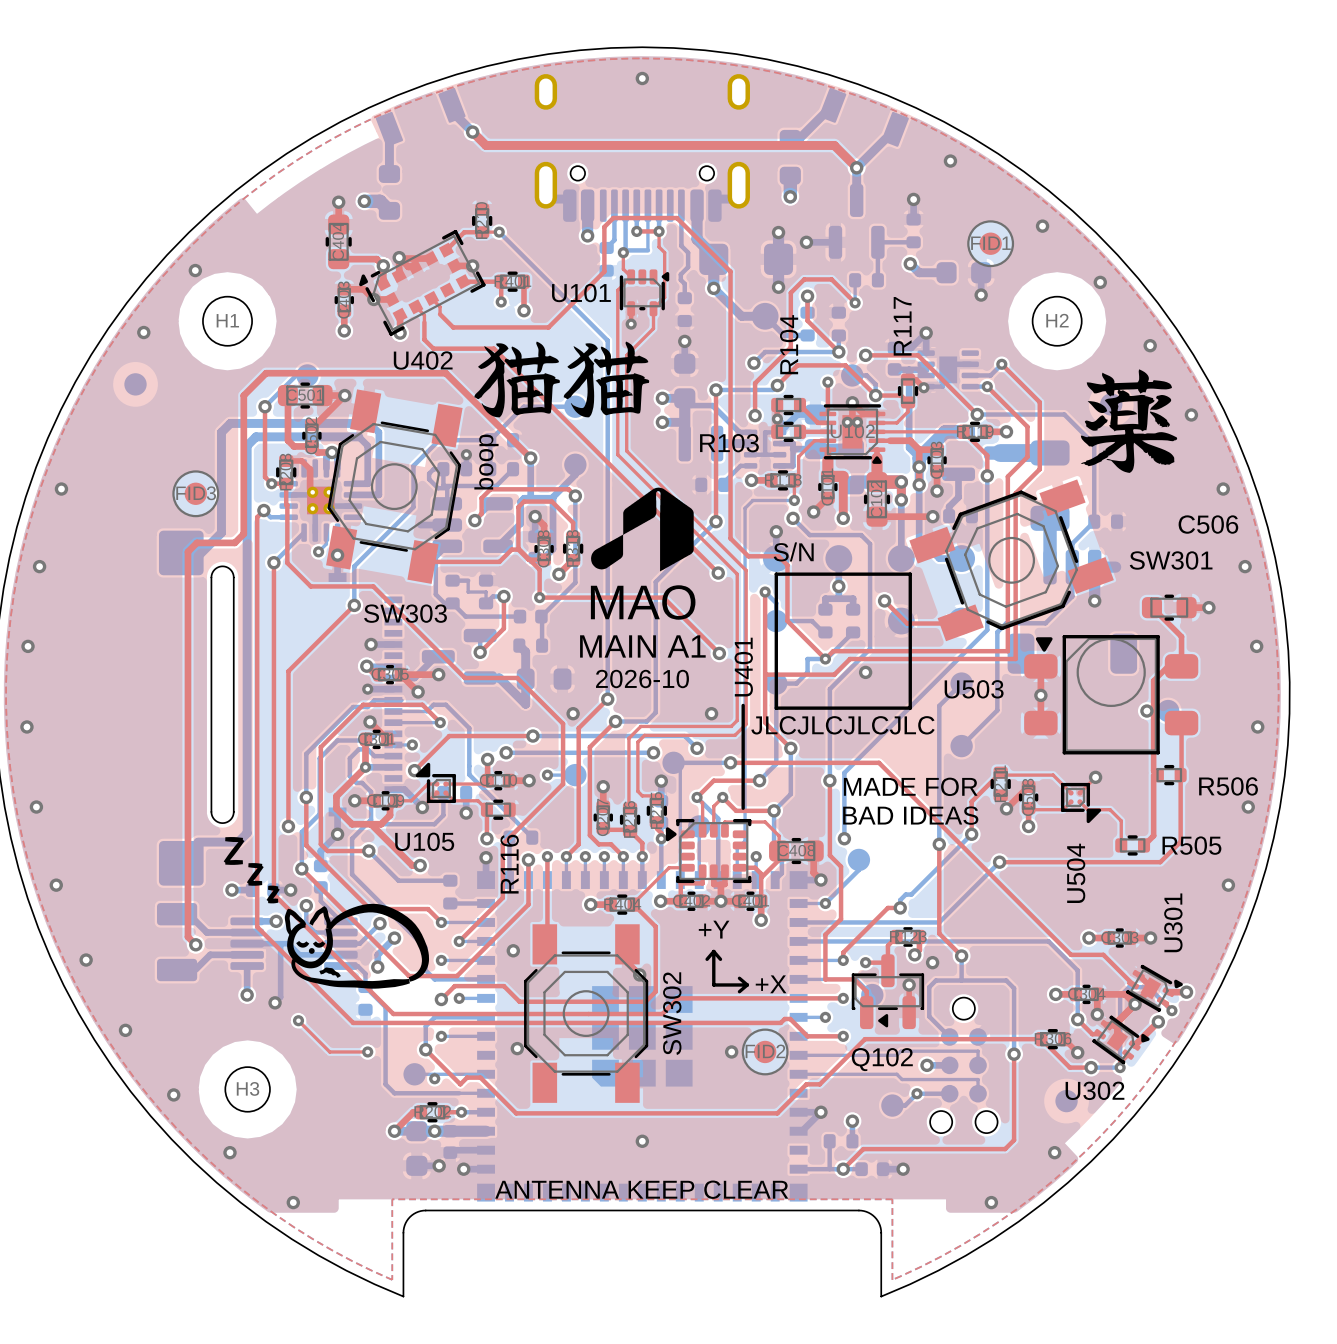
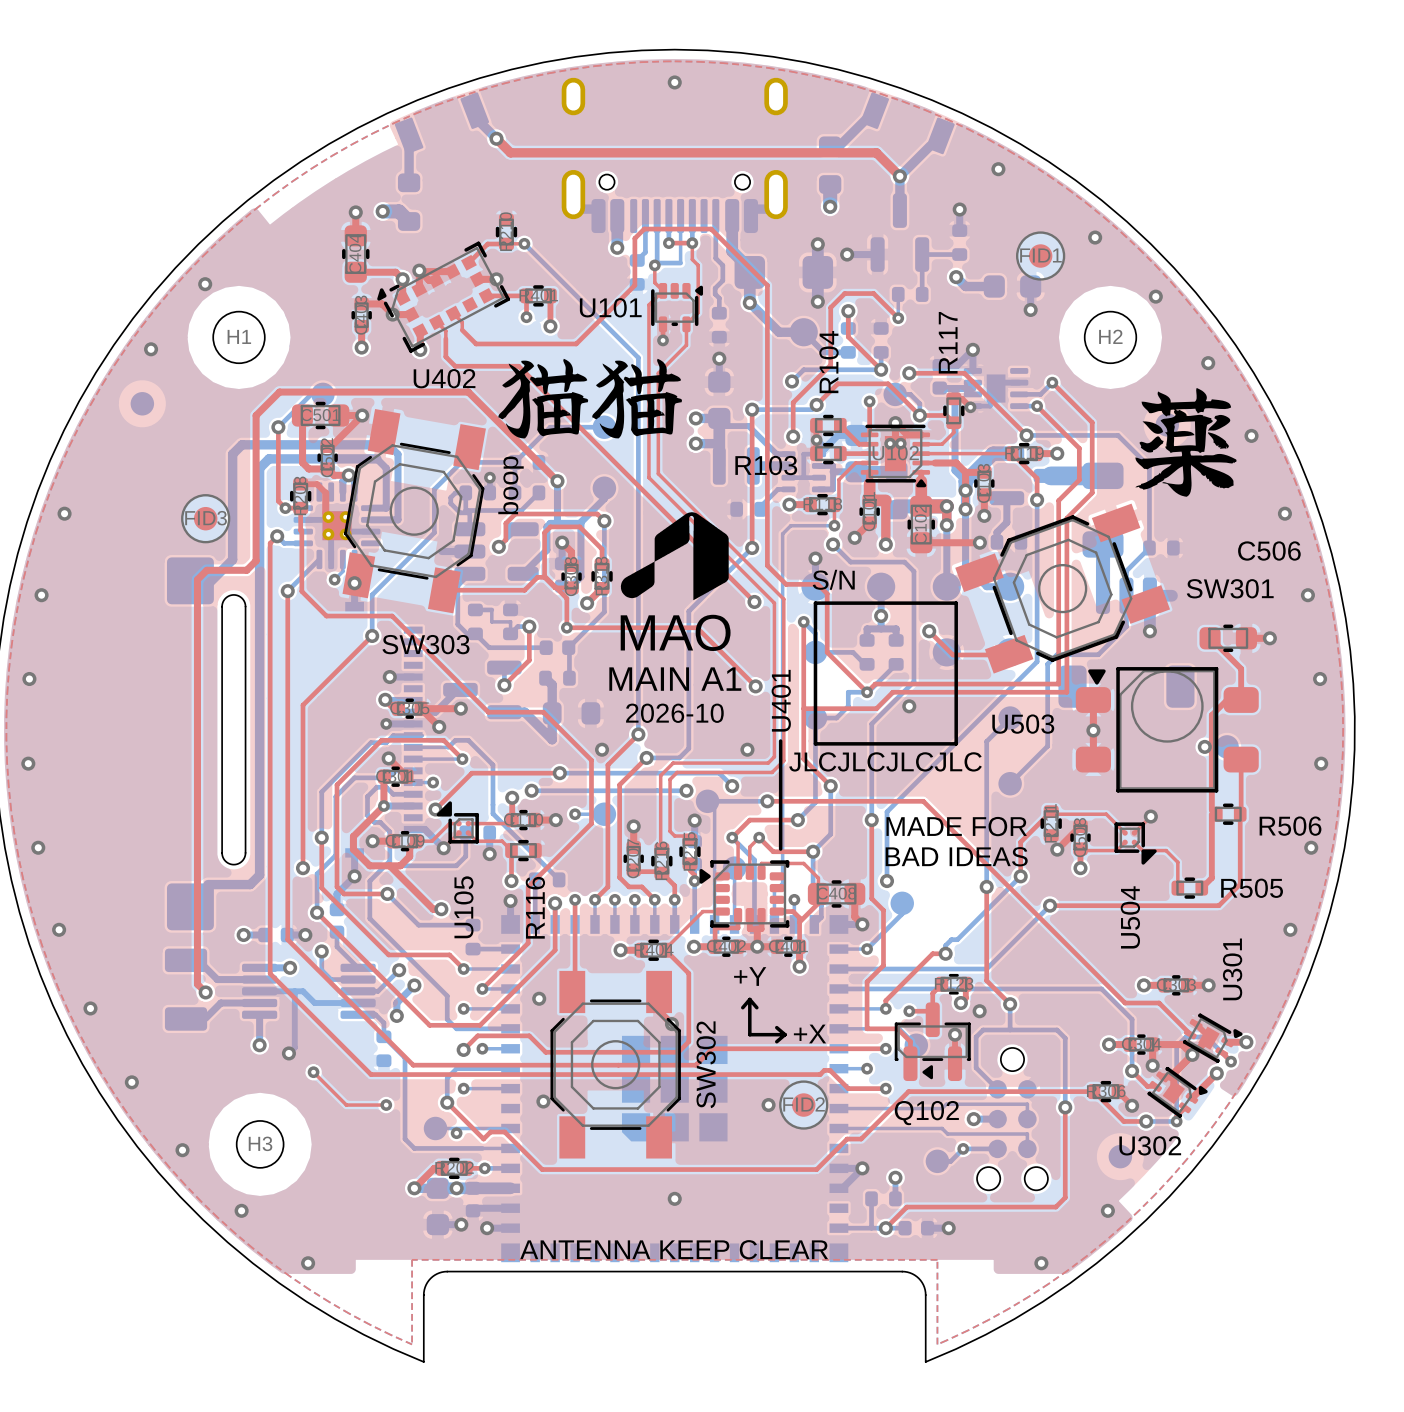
drawing: [223, 837, 430, 989] -> none
U105 name rotation: 0° (424, 841) -> 90° counterclockwise (463, 907)

